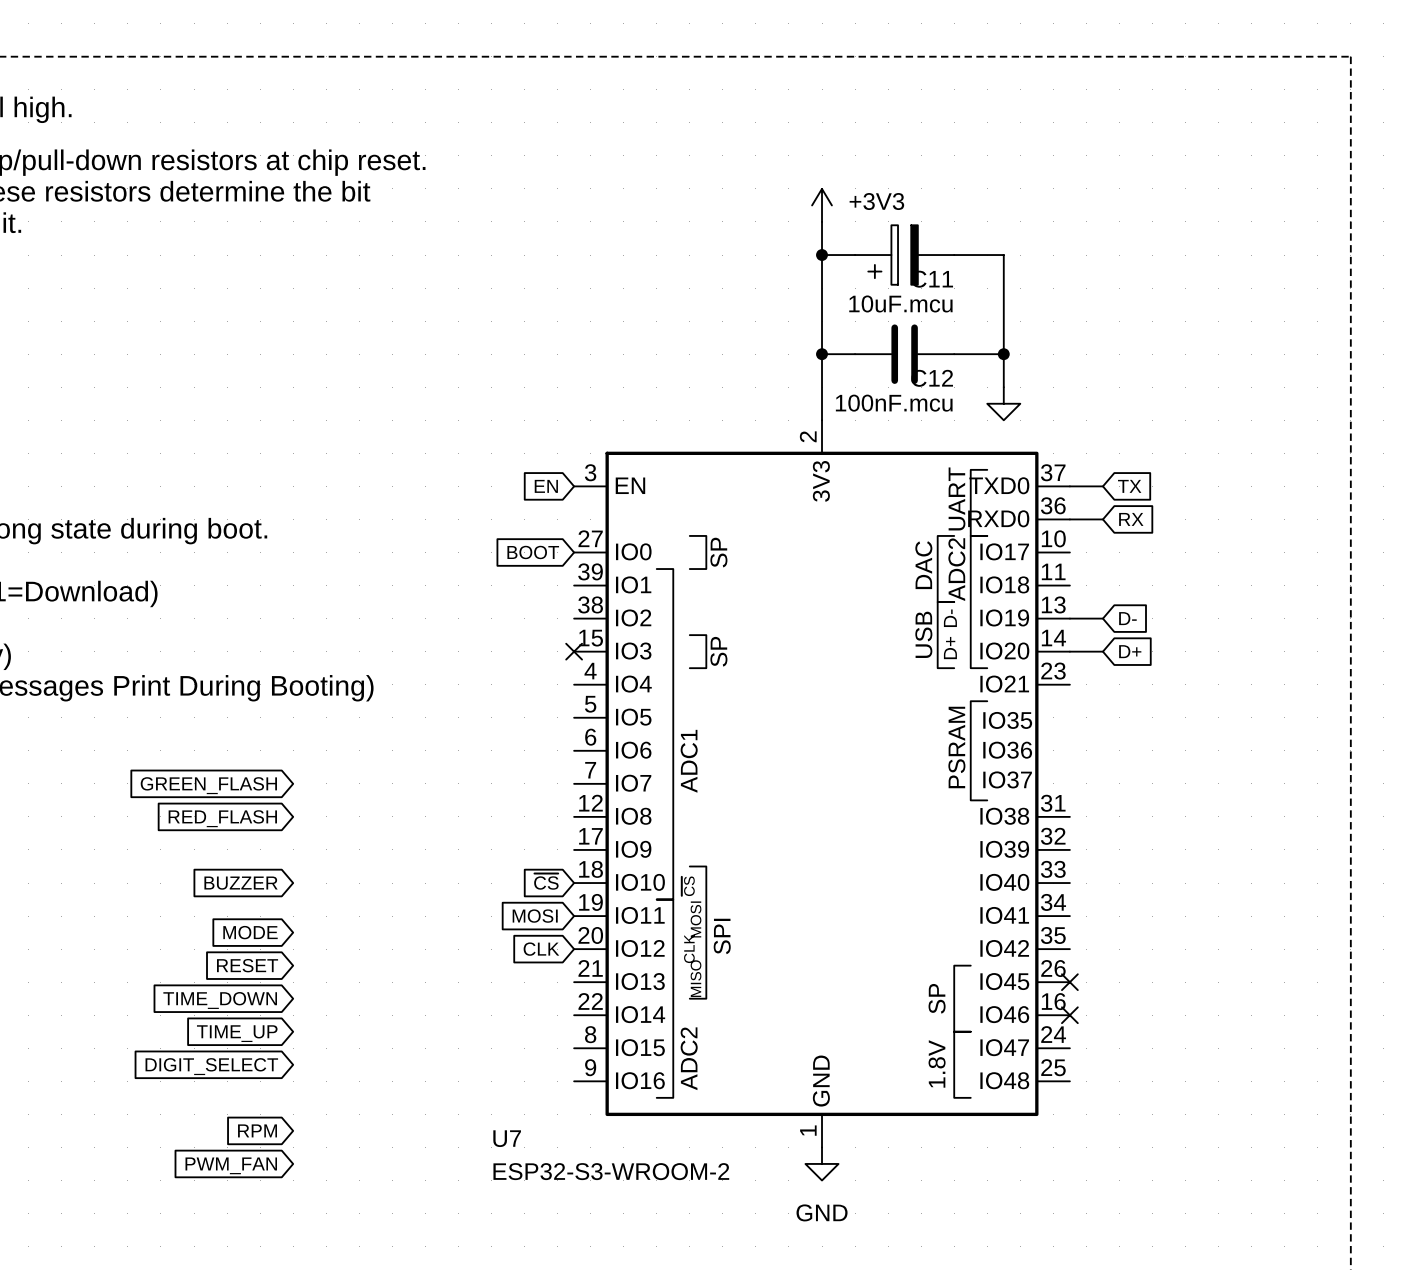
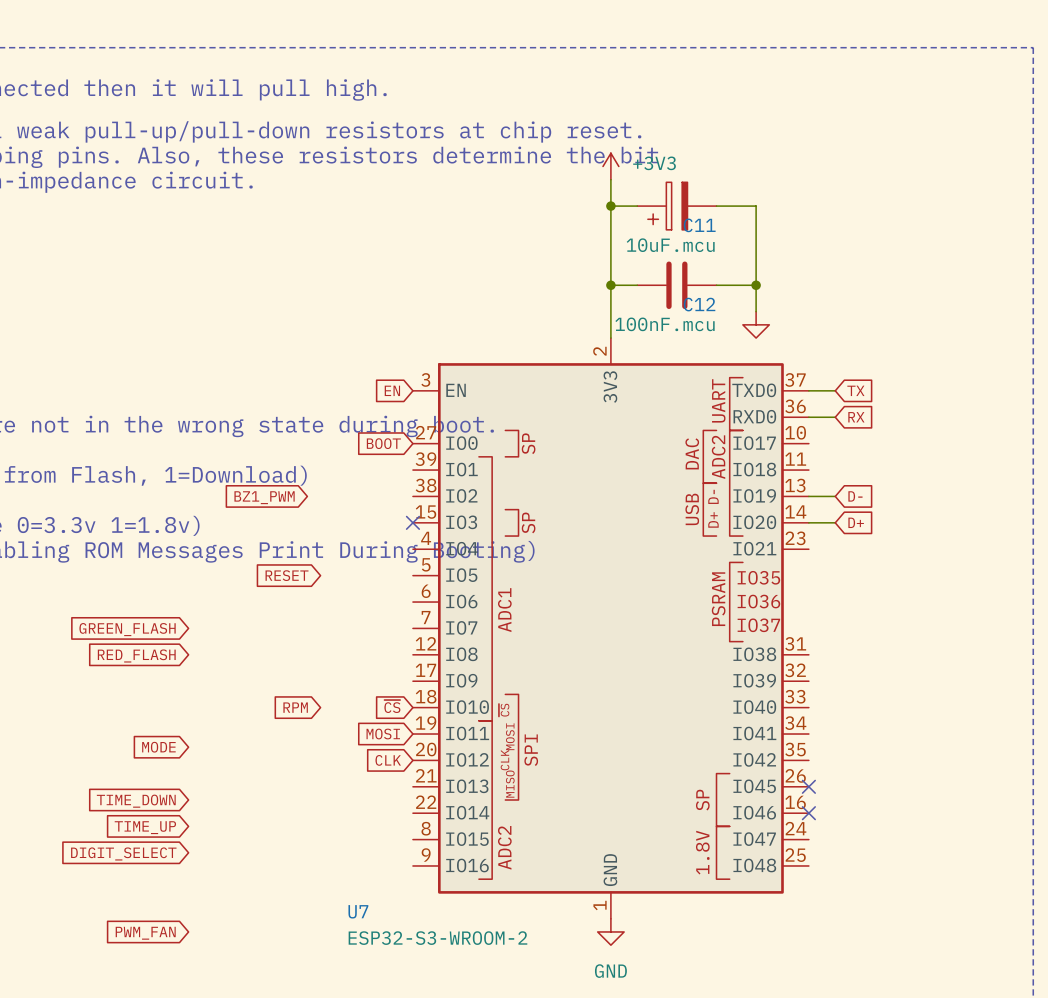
global label: none -> BZ1_PWM (264, 497)
global label: BUZZER (241, 883) -> none
global label position: RESET (247, 965) -> RESET (287, 575)
global label position: RPM (257, 1130) -> RPM (295, 707)

